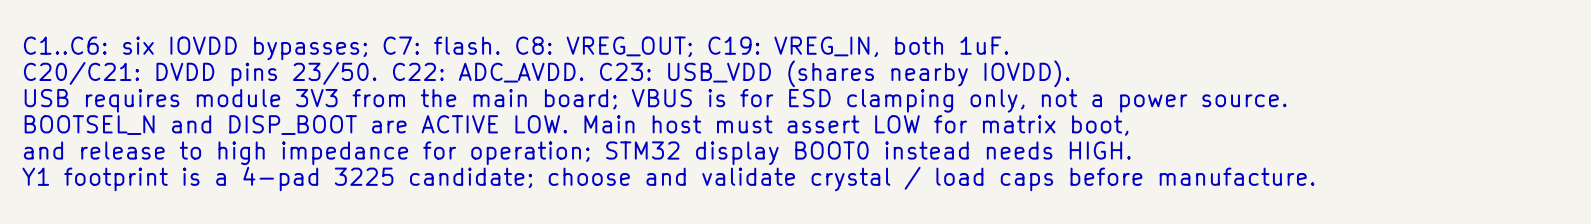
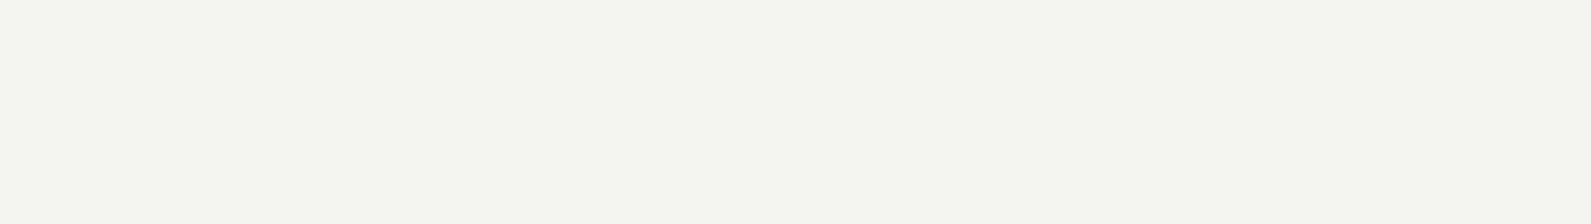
text: C1..C6: six IOVDD bypasses; C7: flash. C8: VREG_OUT; C19: VREG_IN, both 1uF. (516, 48) -> none
text: C20/C21: DVDD pins 23/50. C22: ADC_AVDD. C23: USB_VDD (shares nearby IOVDD). (546, 73) -> none
text: USB requires module 3V3 from the main board; VBUS is for ESD clamping only, not a power source. (655, 100) -> none
text: BOOTSEL_N and DISP_BOOT are ACTIVE LOW. Main host must assert LOW for matrix boot, (576, 125) -> none
text: and release to high impedance for operation; STM32 display BOOT0 instead needs HIGH. (577, 153) -> none
text: Y1 footprint is a 4-pad 3225 candidate; choose and validate crystal / load caps before manufacture. (668, 179) -> none

